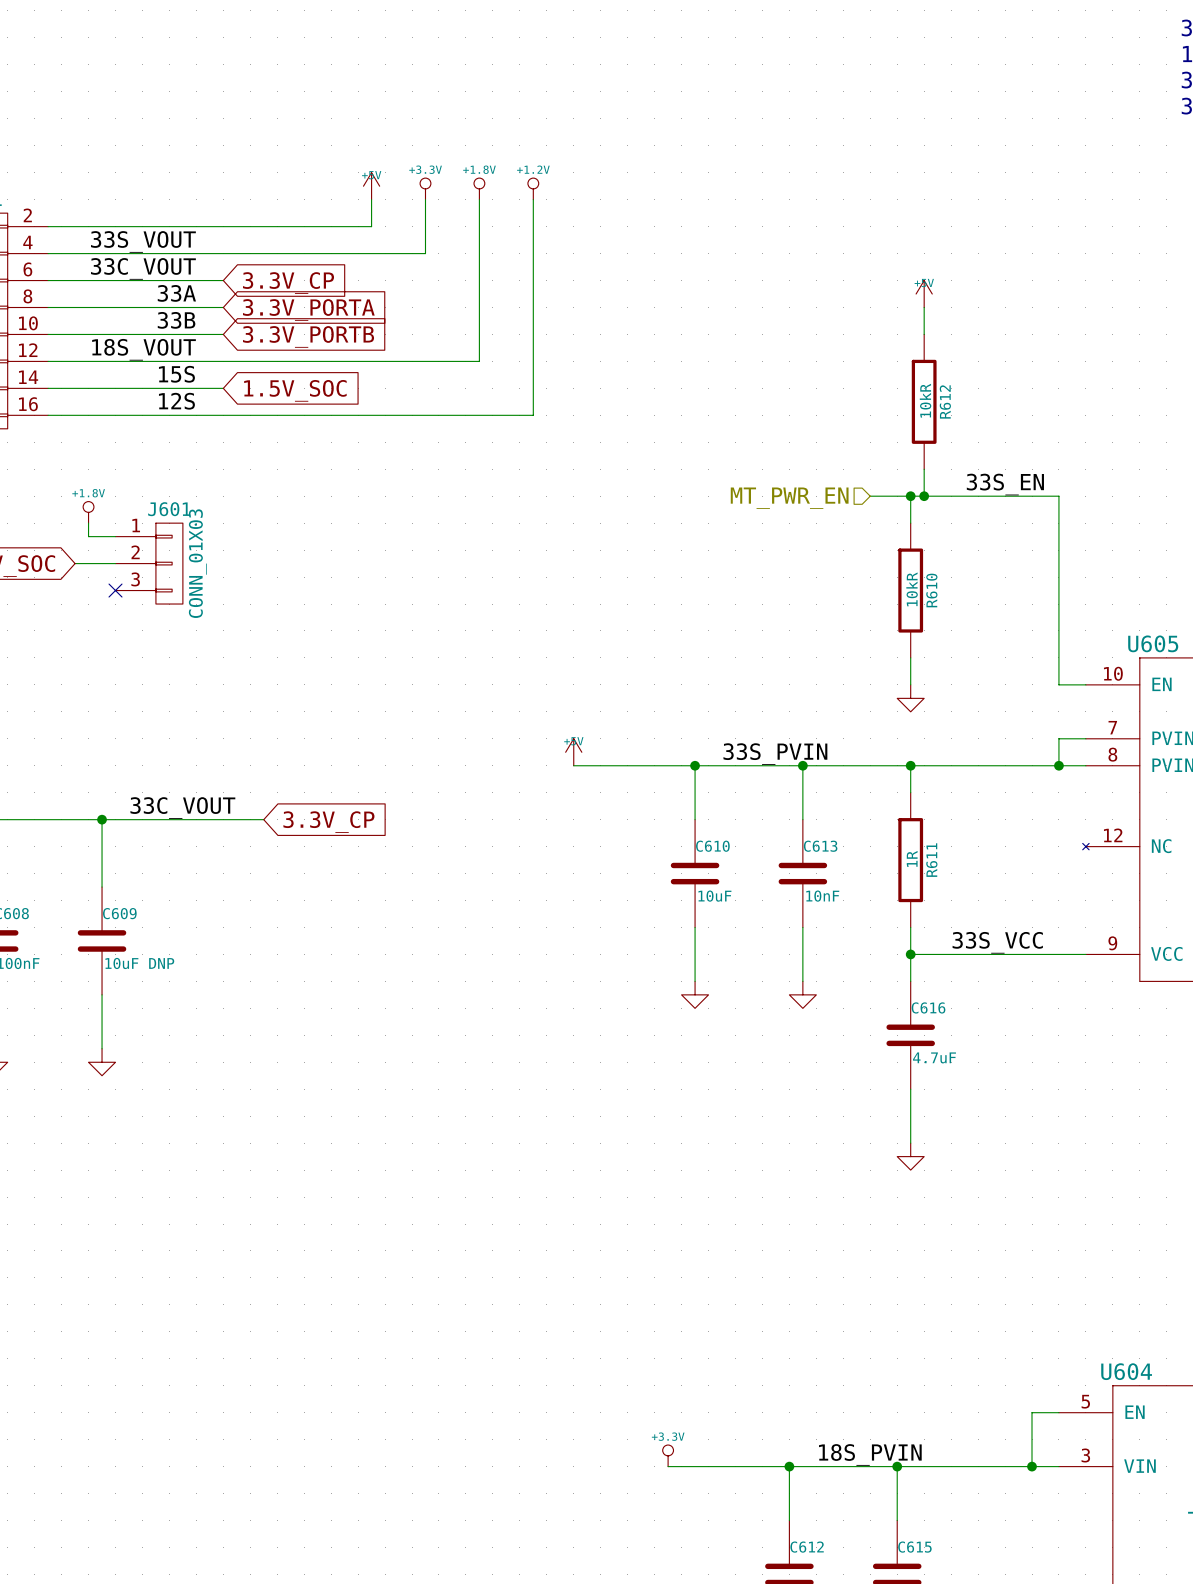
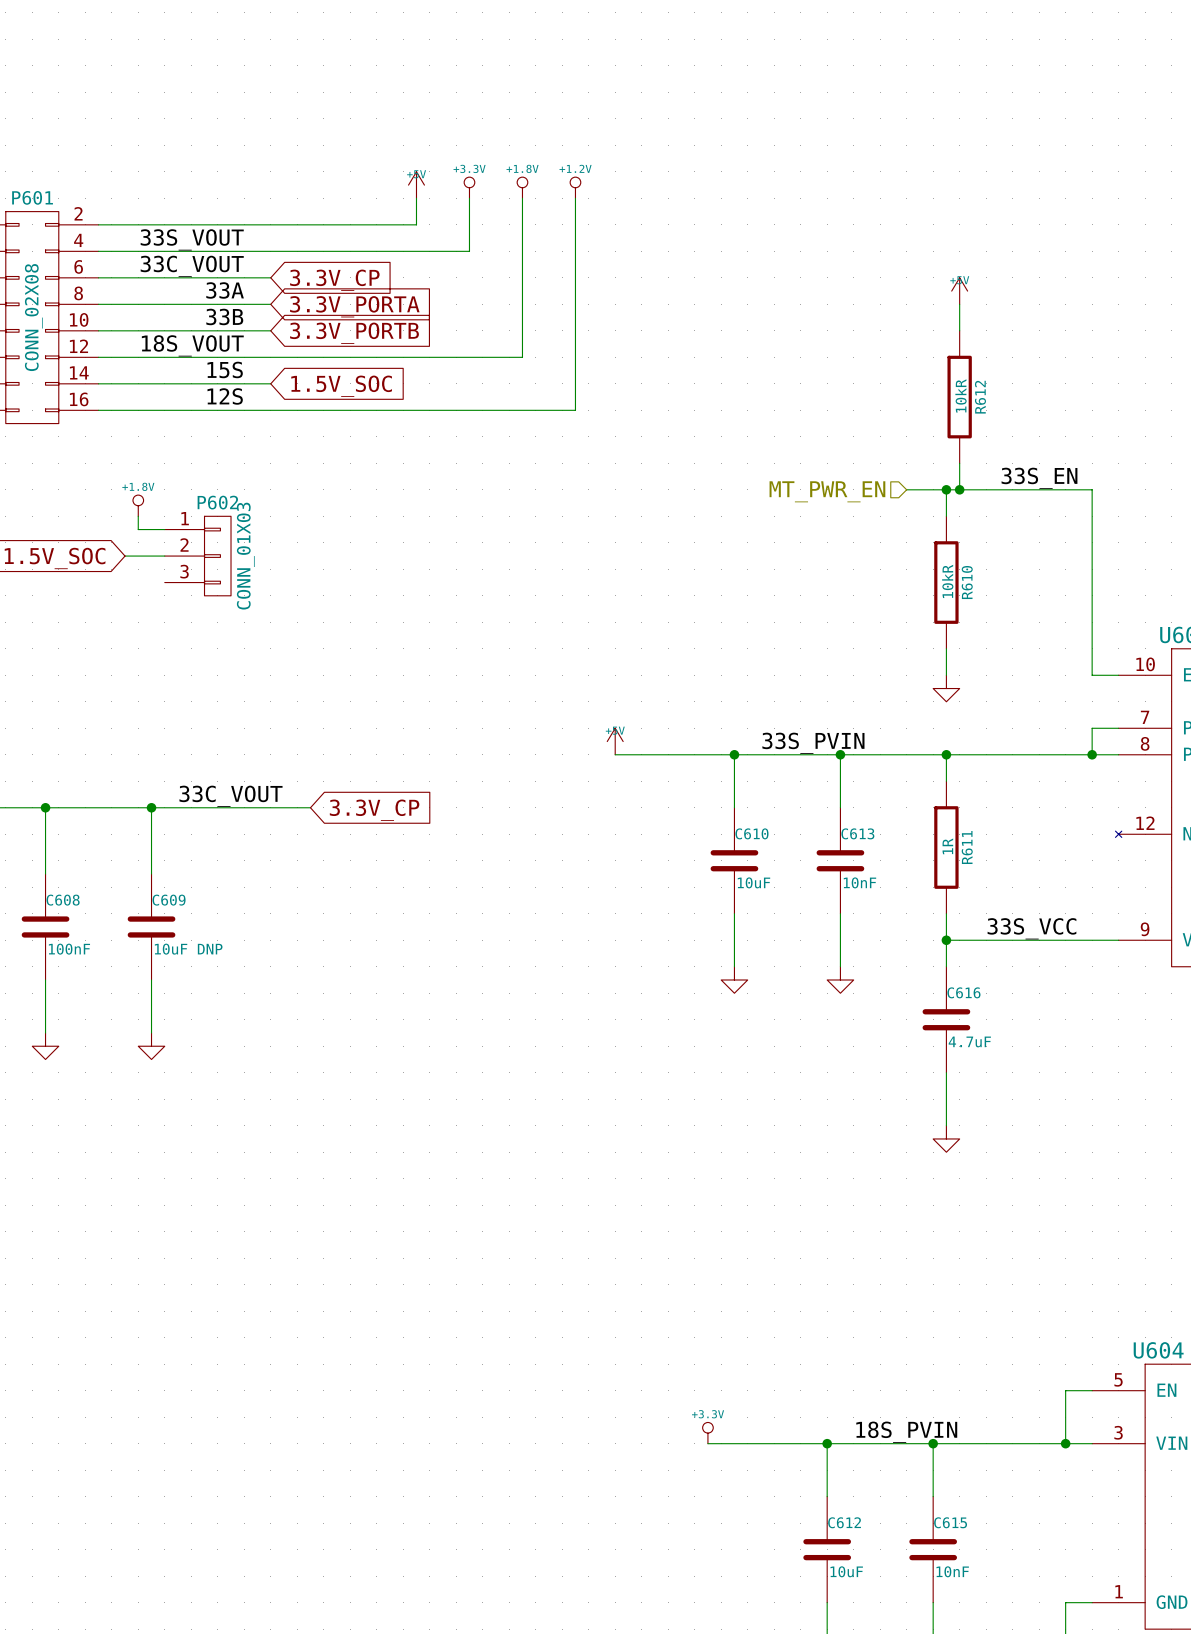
J601 name: J601 (169, 509) -> P602 (217, 502)
no-connect mark: (115, 590) -> none

